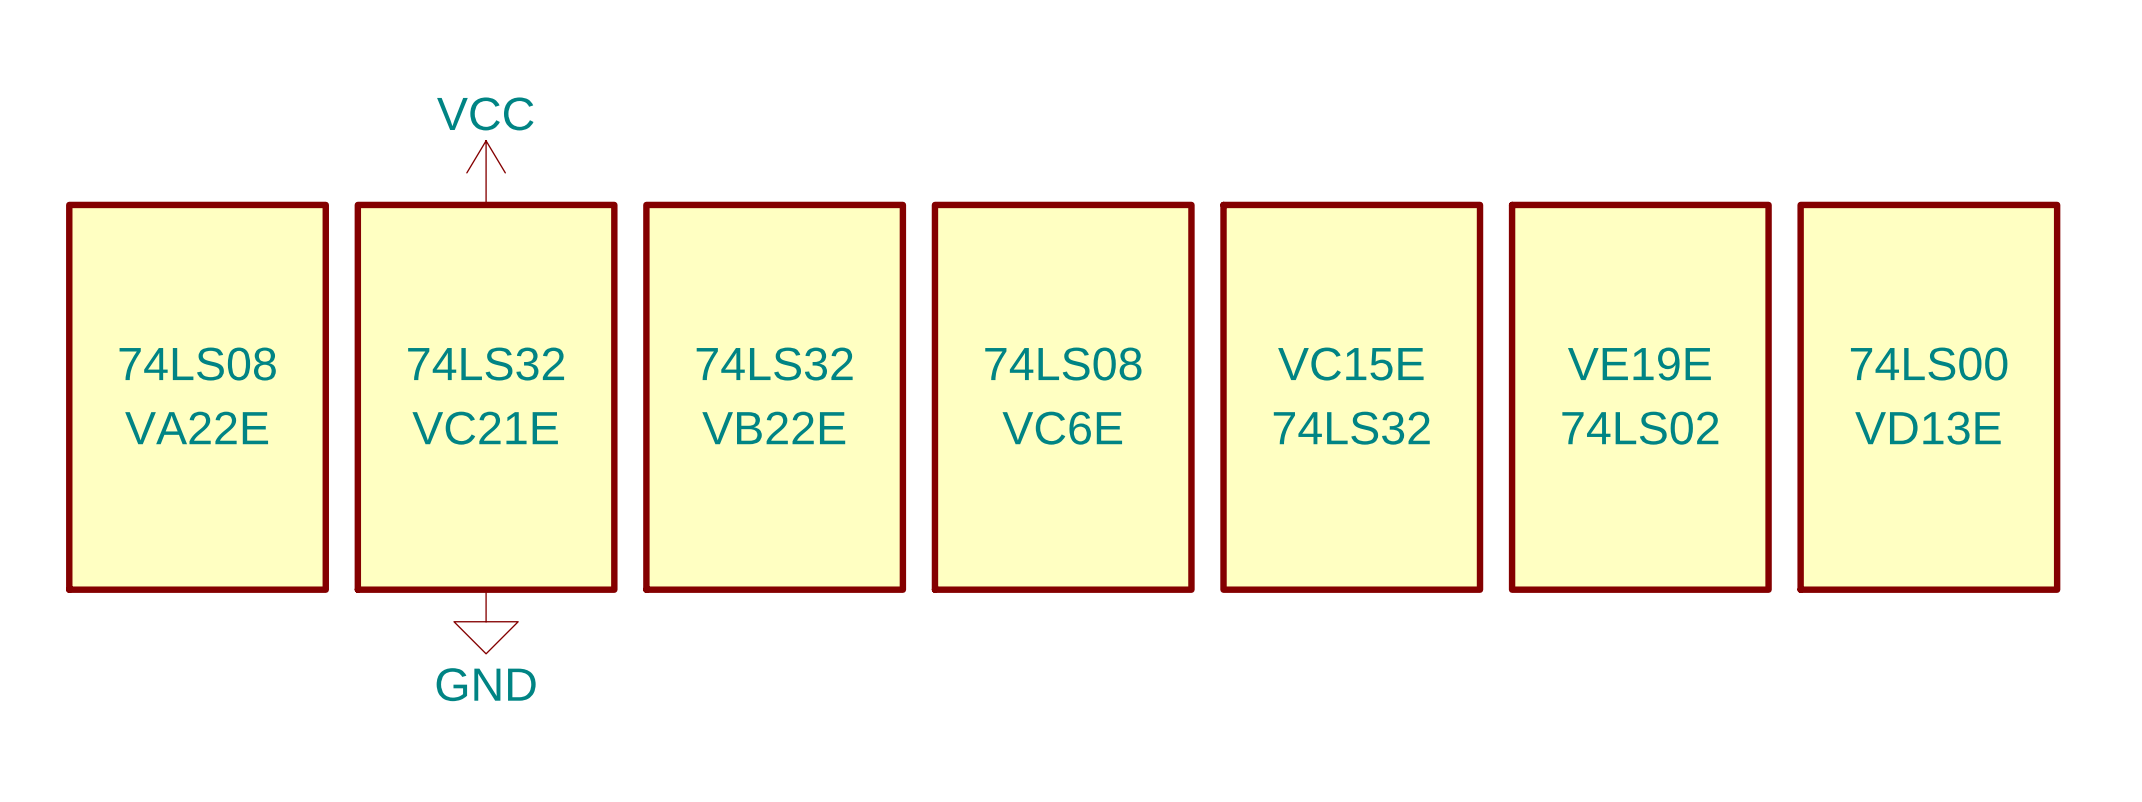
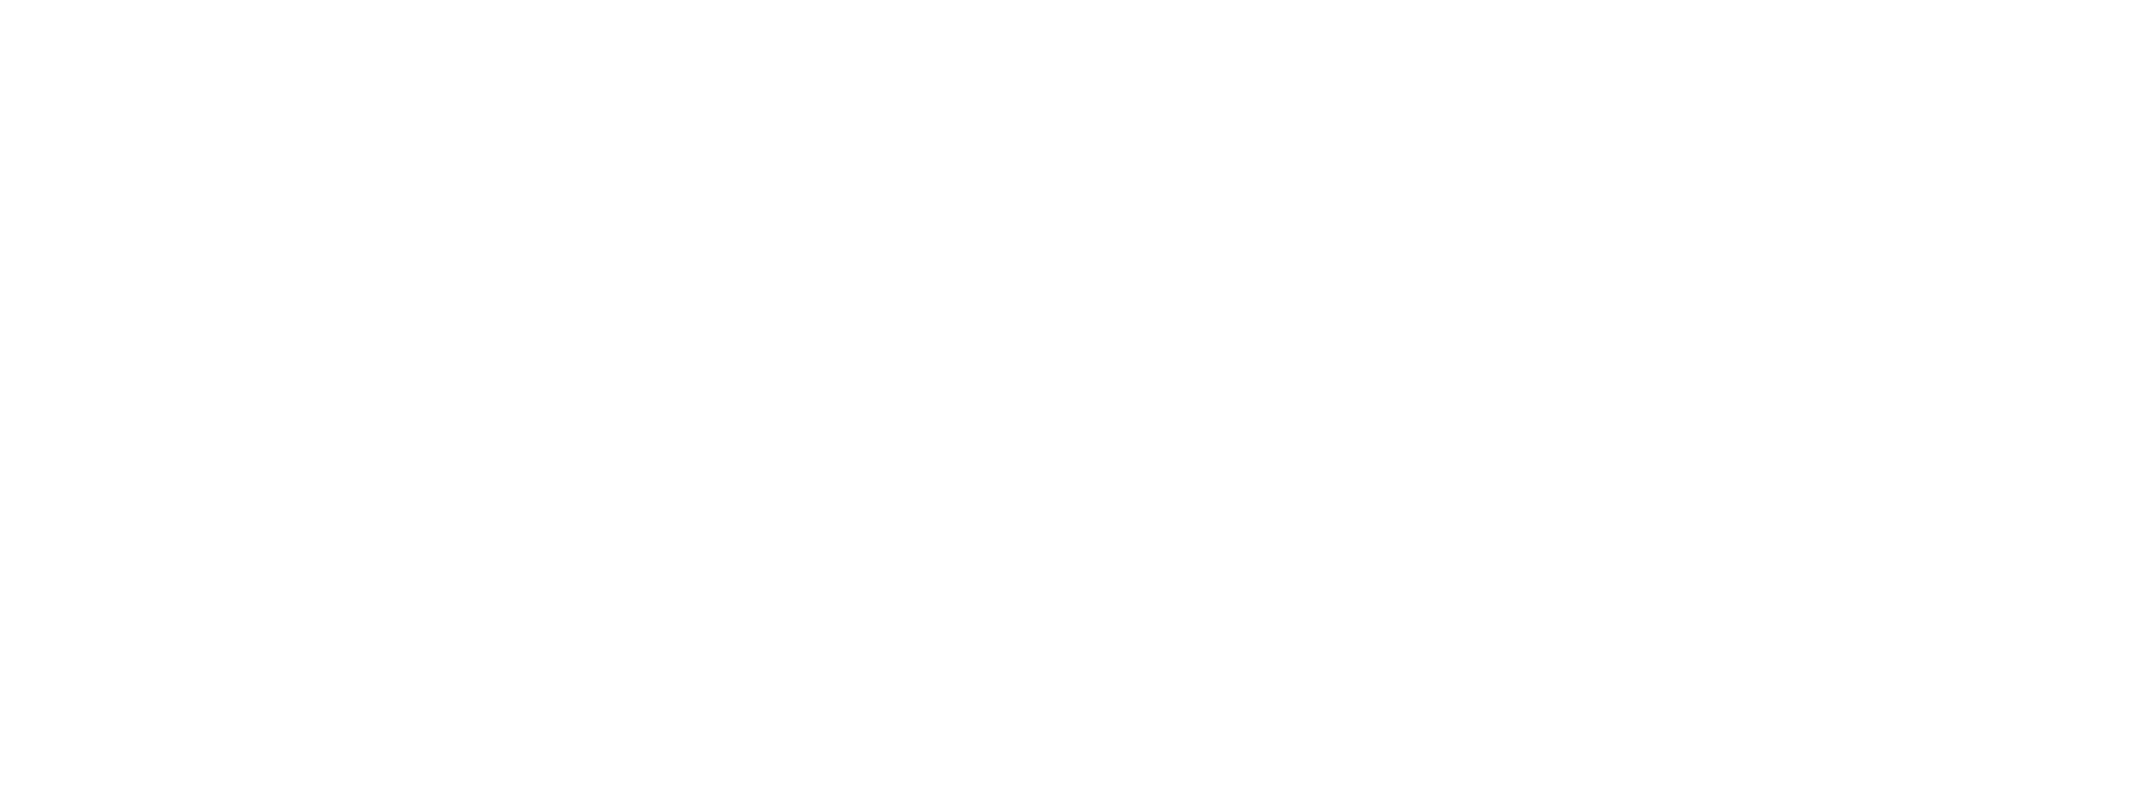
power symbol: VCC (486, 172) -> none
VA22E: 74LS08 (197, 397) -> none
VC21E: 74LS32 (486, 397) -> none
VB22E: 74LS32 (774, 397) -> none
VC6E: 74LS08 (1063, 397) -> none
VC15E: 74LS32 (1351, 397) -> none
VE19E: 74LS02 (1640, 397) -> none
VD13E: 74LS00 (1928, 397) -> none
power symbol: GND (486, 621) -> none

